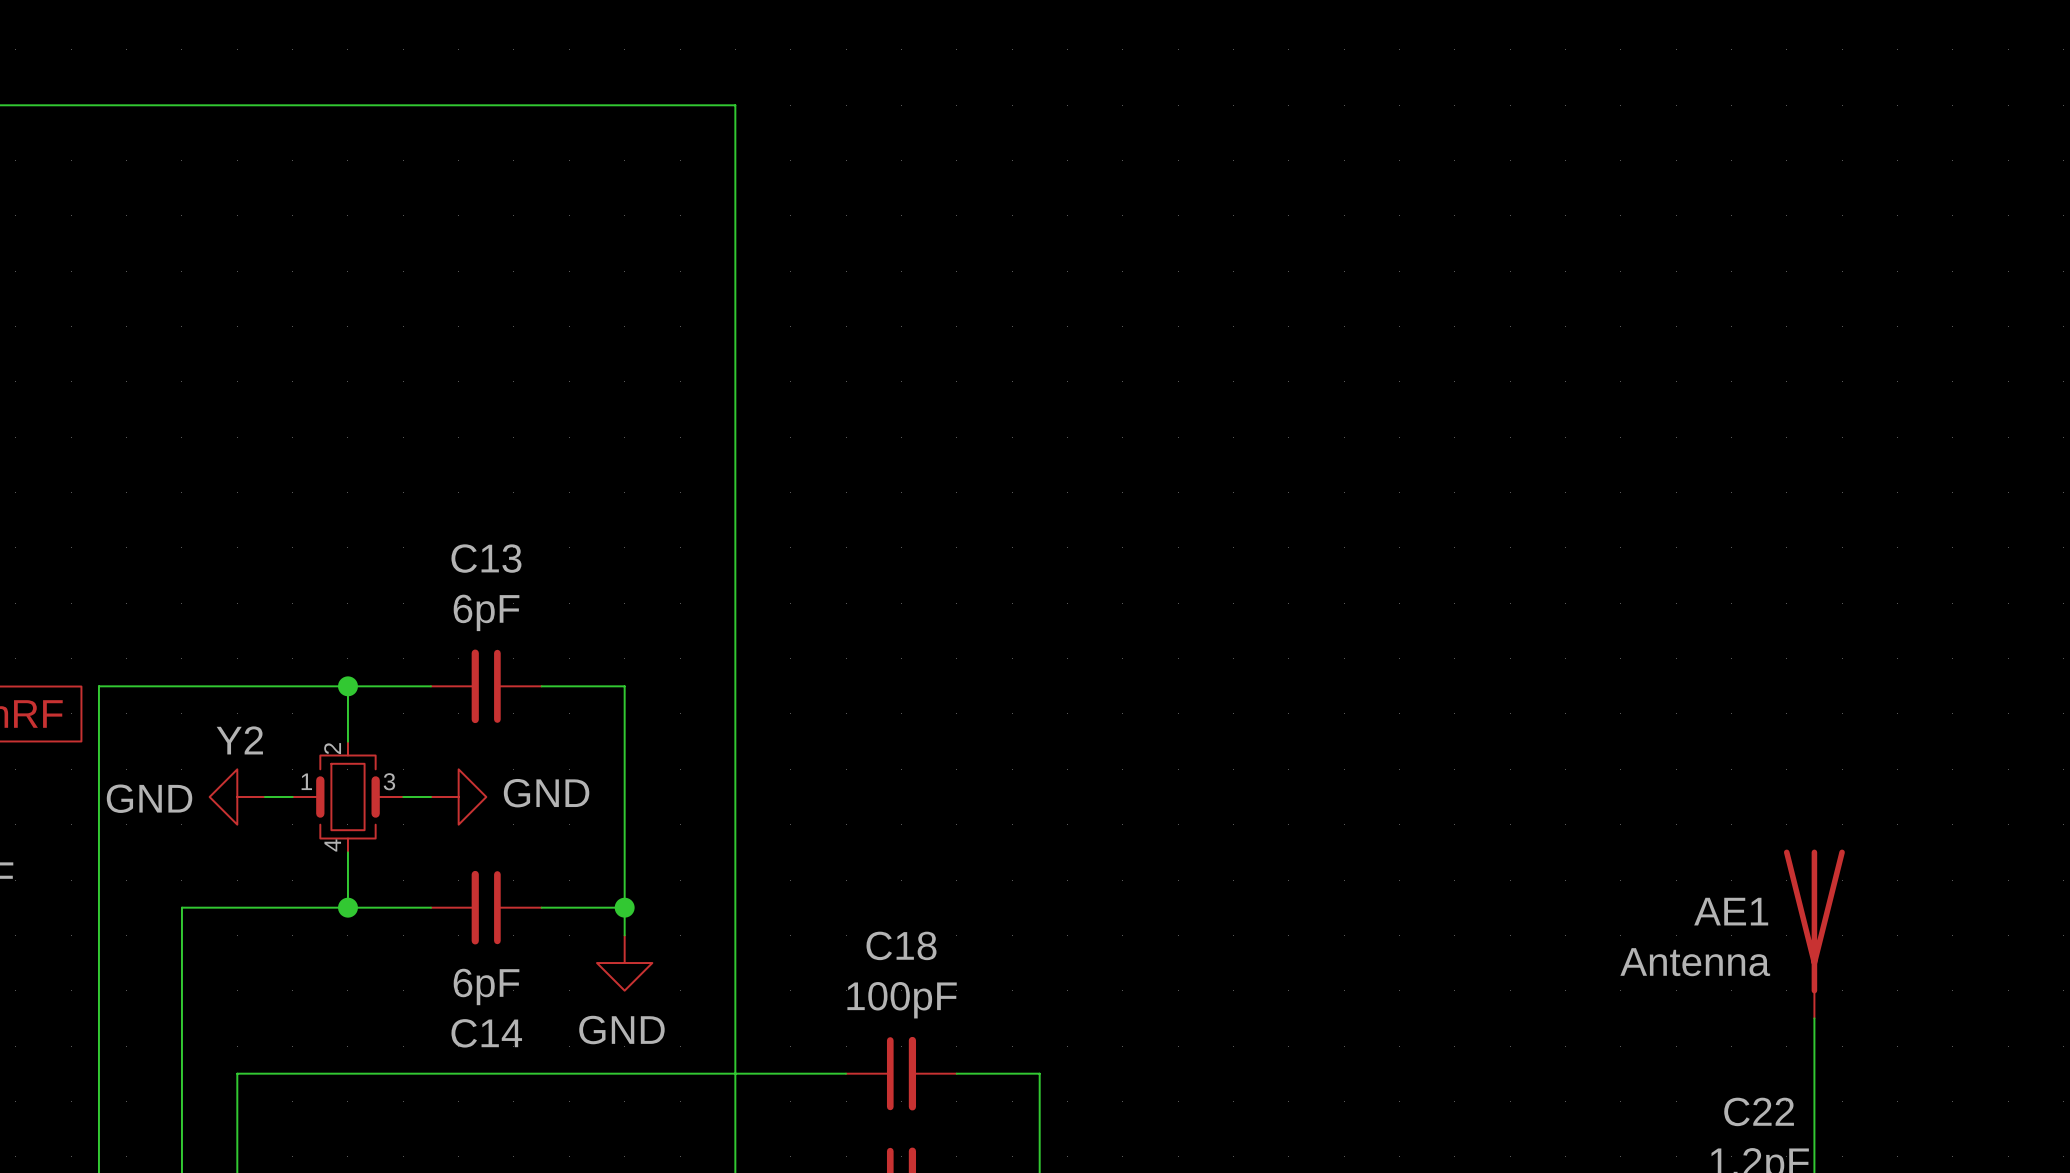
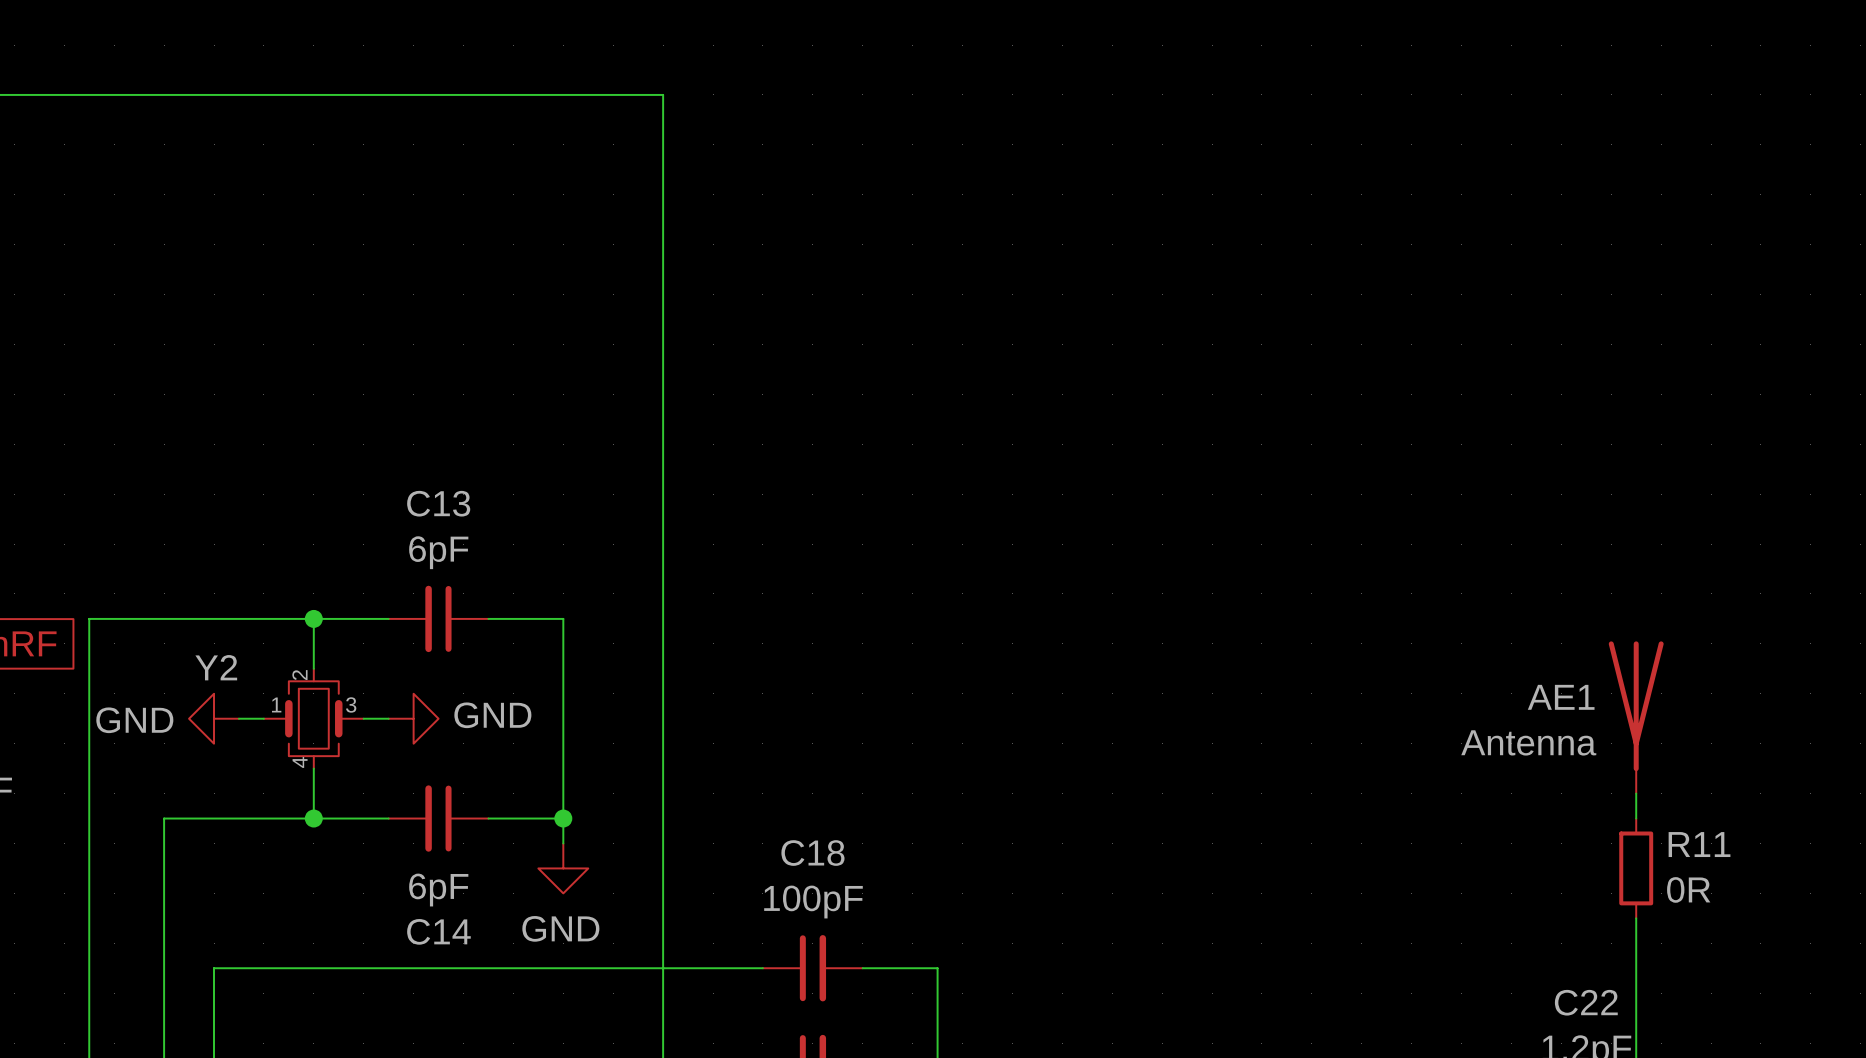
AE1 position: (1814, 933) -> (1636, 717)
R11: none -> 0R (1636, 868)

